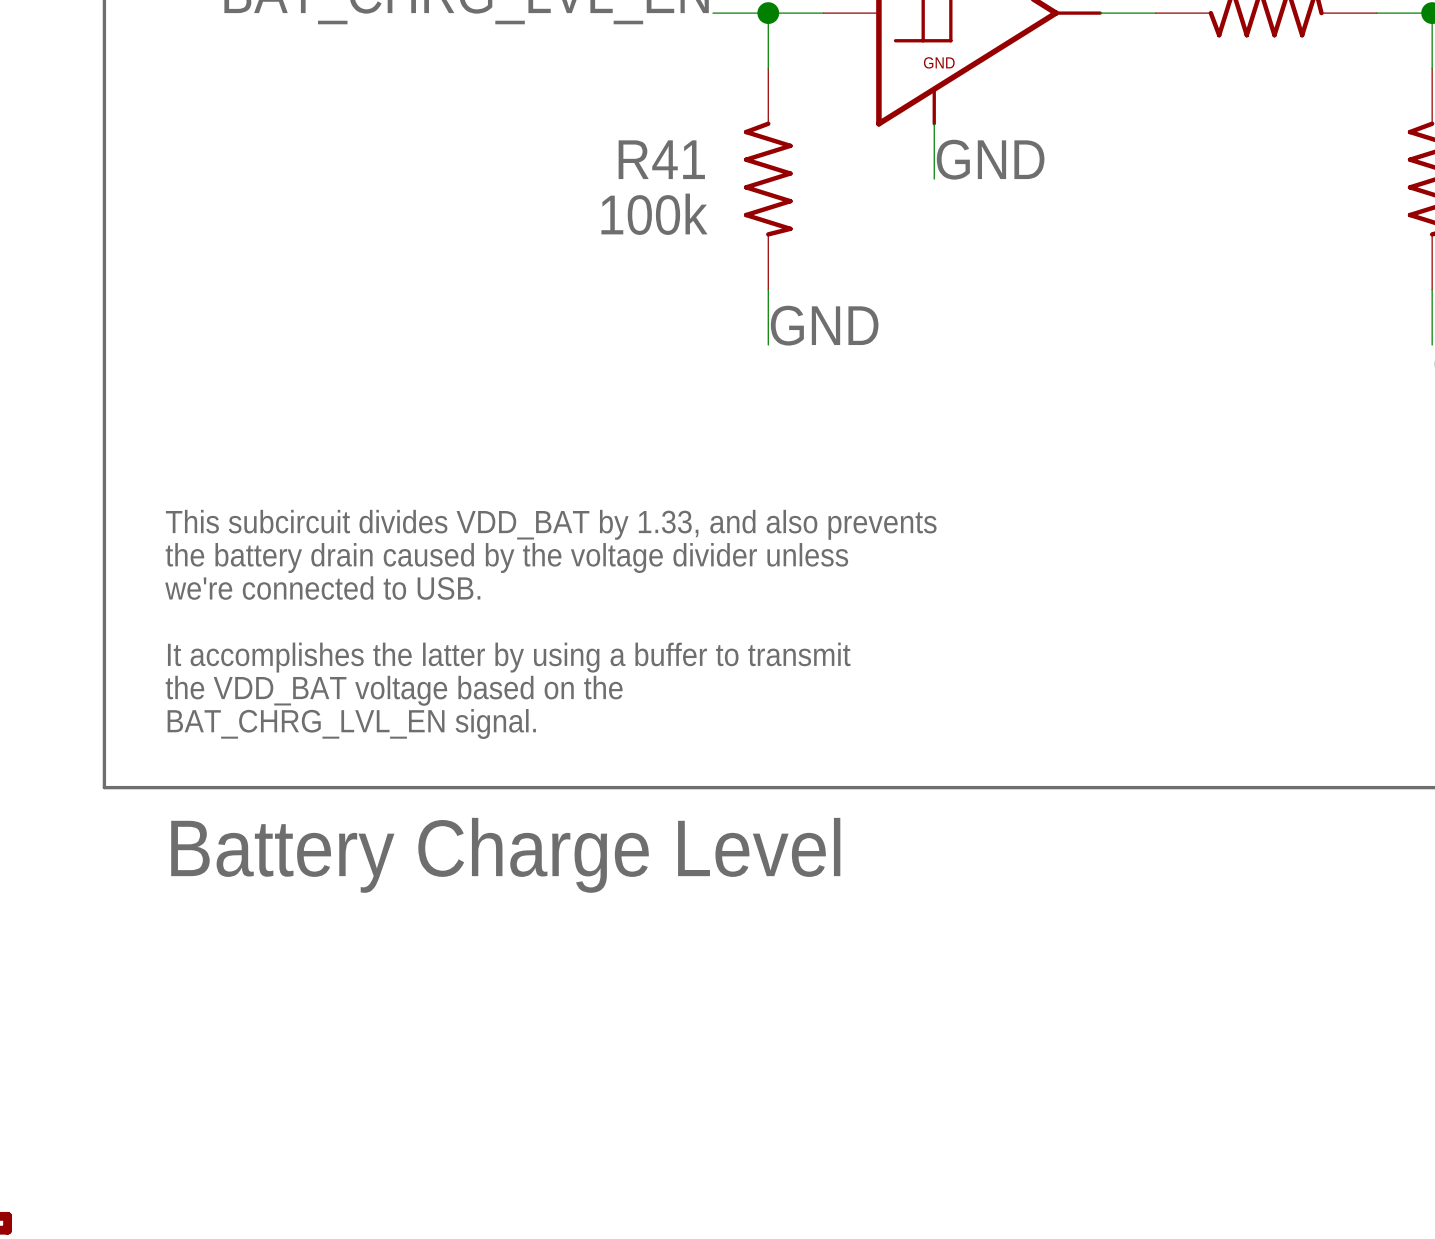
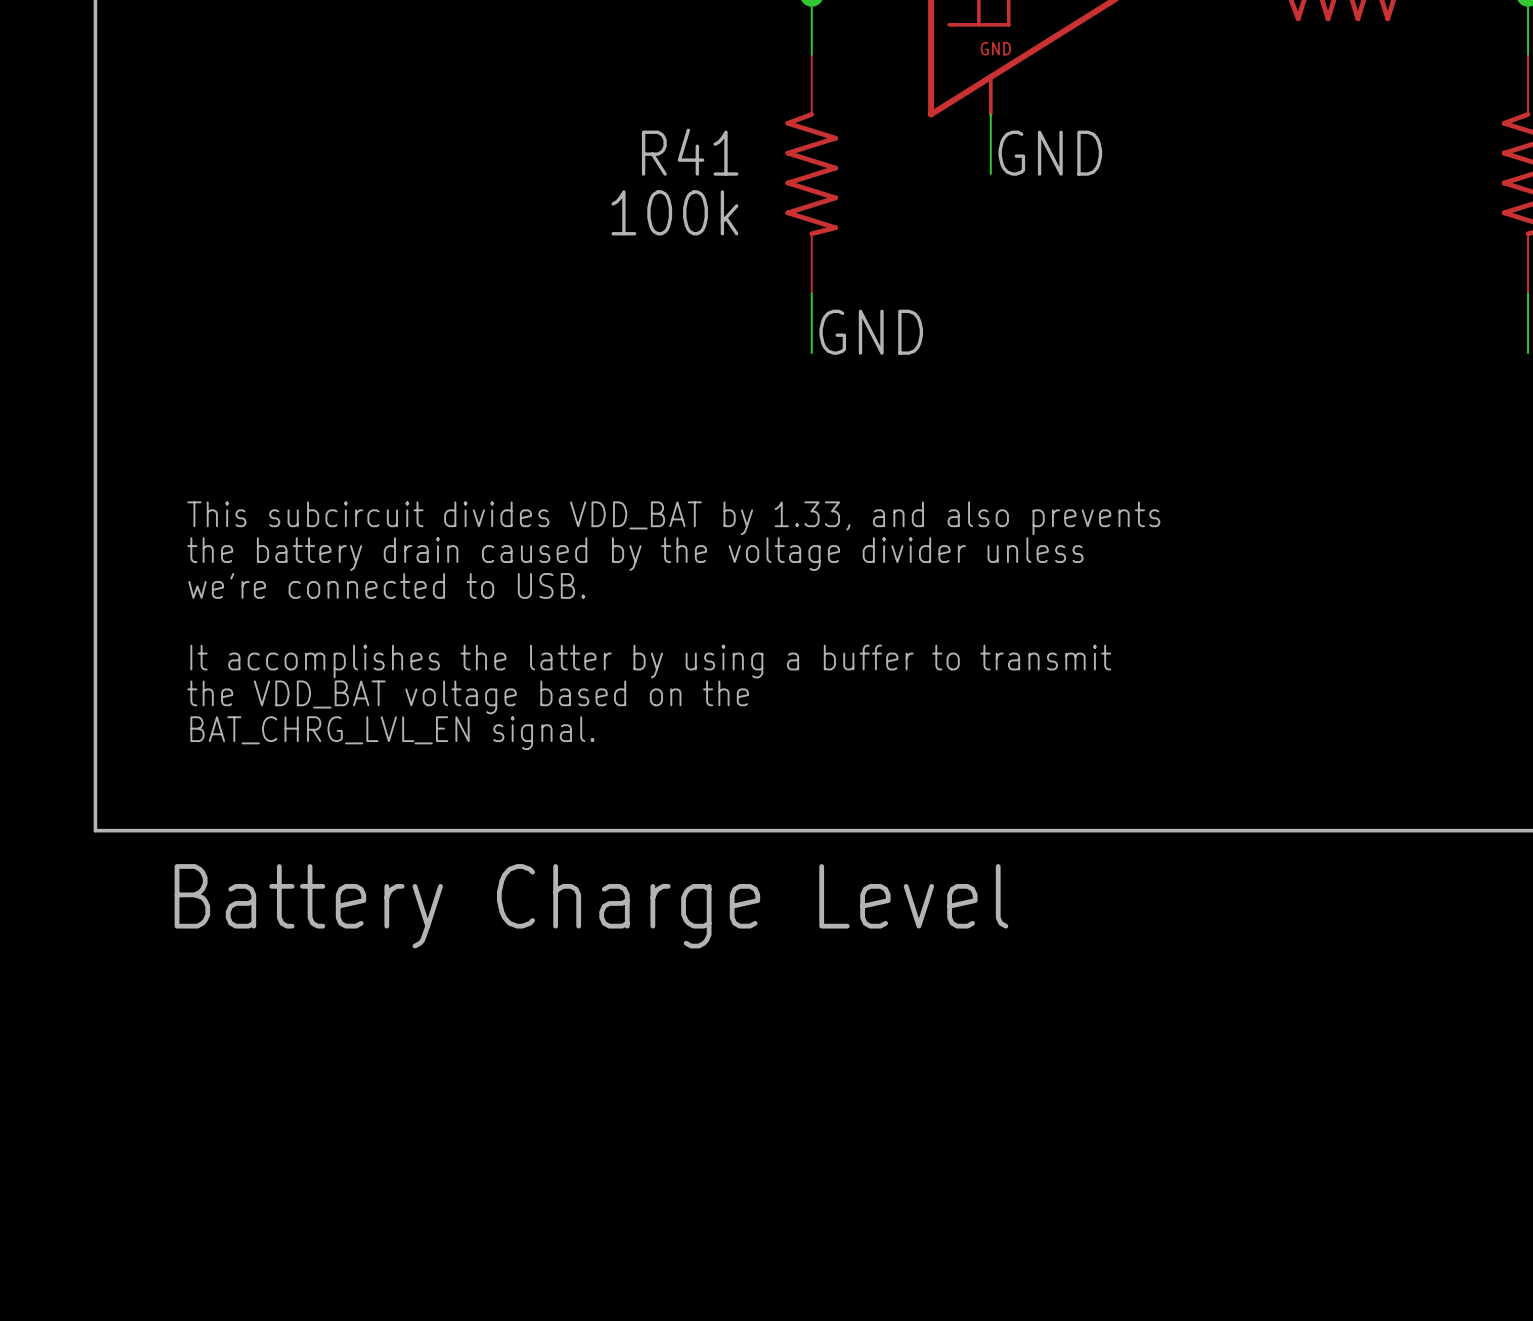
text position: This subcircuit divides VDD_BAT by 1.33, and also prevents (551, 524) -> This subcircuit divides VDD_BAT by 1.33, and also prevents (673, 518)
text position: the battery drain caused by the voltage divider unless (506, 558) -> the battery drain caused by the voltage divider unless (635, 554)
text position: we're connected to USB. (322, 588) -> we're connected to USB. (386, 585)
text position: It accomplishes the latter by using a buffer to transmit (509, 657) -> It accomplishes the latter by using a buffer to transmit (650, 661)
text position: the VDD_BAT voltage based on the (394, 690) -> the VDD_BAT voltage based on the (468, 697)
text position: BAT_CHRG_LVL_EN signal. (351, 723) -> BAT_CHRG_LVL_EN signal. (392, 733)

